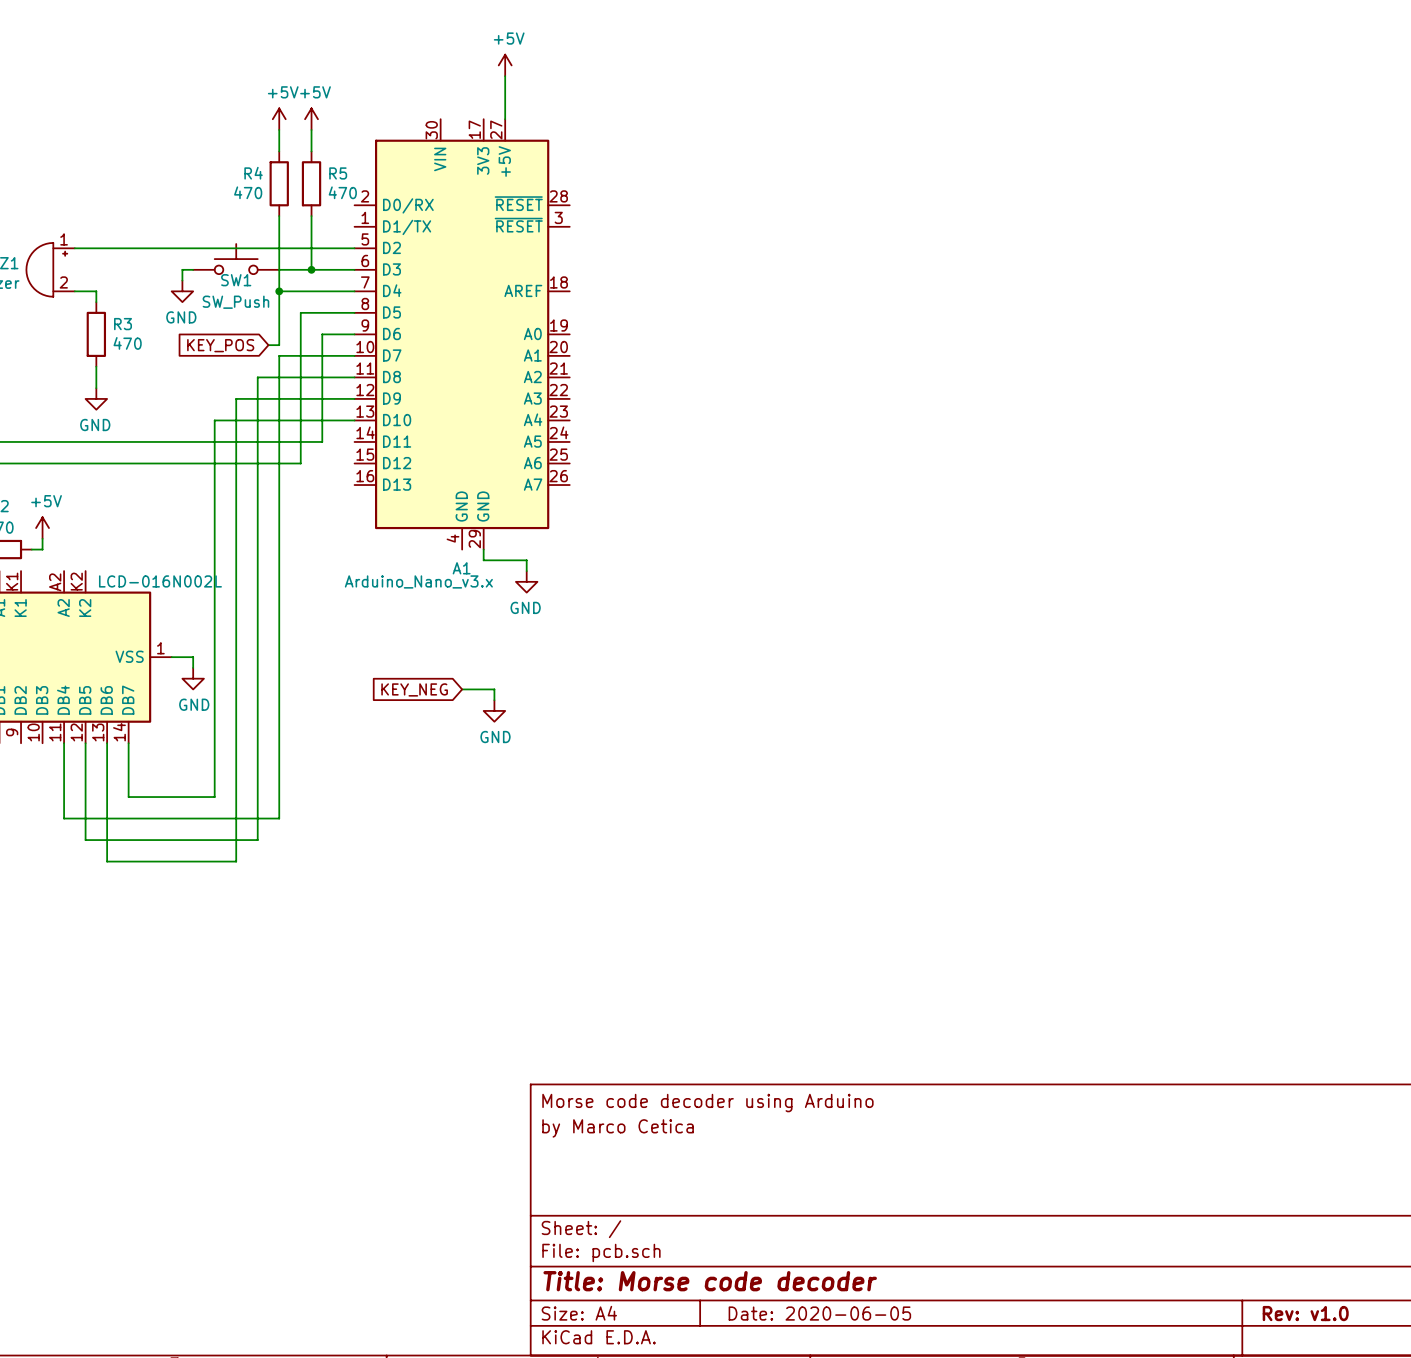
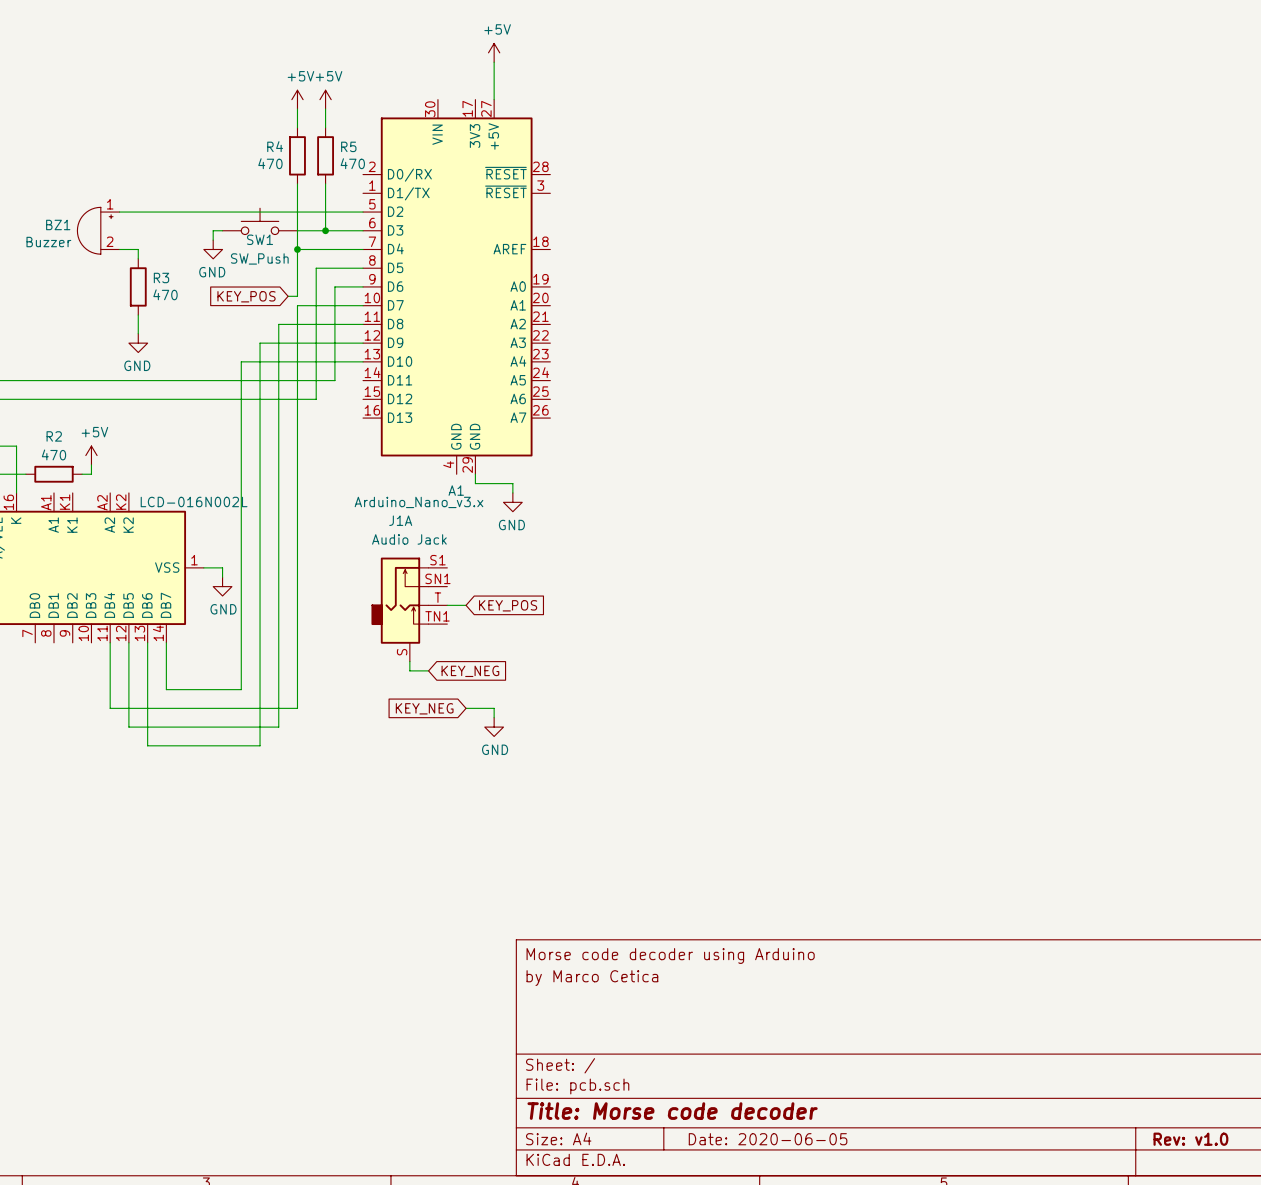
global label: KEY_NEG (414, 689) -> none
wire: (462, 689) (494, 689) (494, 700) -> (466, 708) (494, 708) (494, 717)
wire: none -> (447, 605) (466, 605)
global label: none -> KEY_POS (508, 605)
J1A: none -> Audio Jack (409, 609)
power symbol position: GND (494, 710) -> GND (494, 727)
wire: none -> (409, 661) (409, 670) (428, 670)
global label: none -> KEY_NEG (470, 671)
global label: none -> KEY_NEG (424, 708)

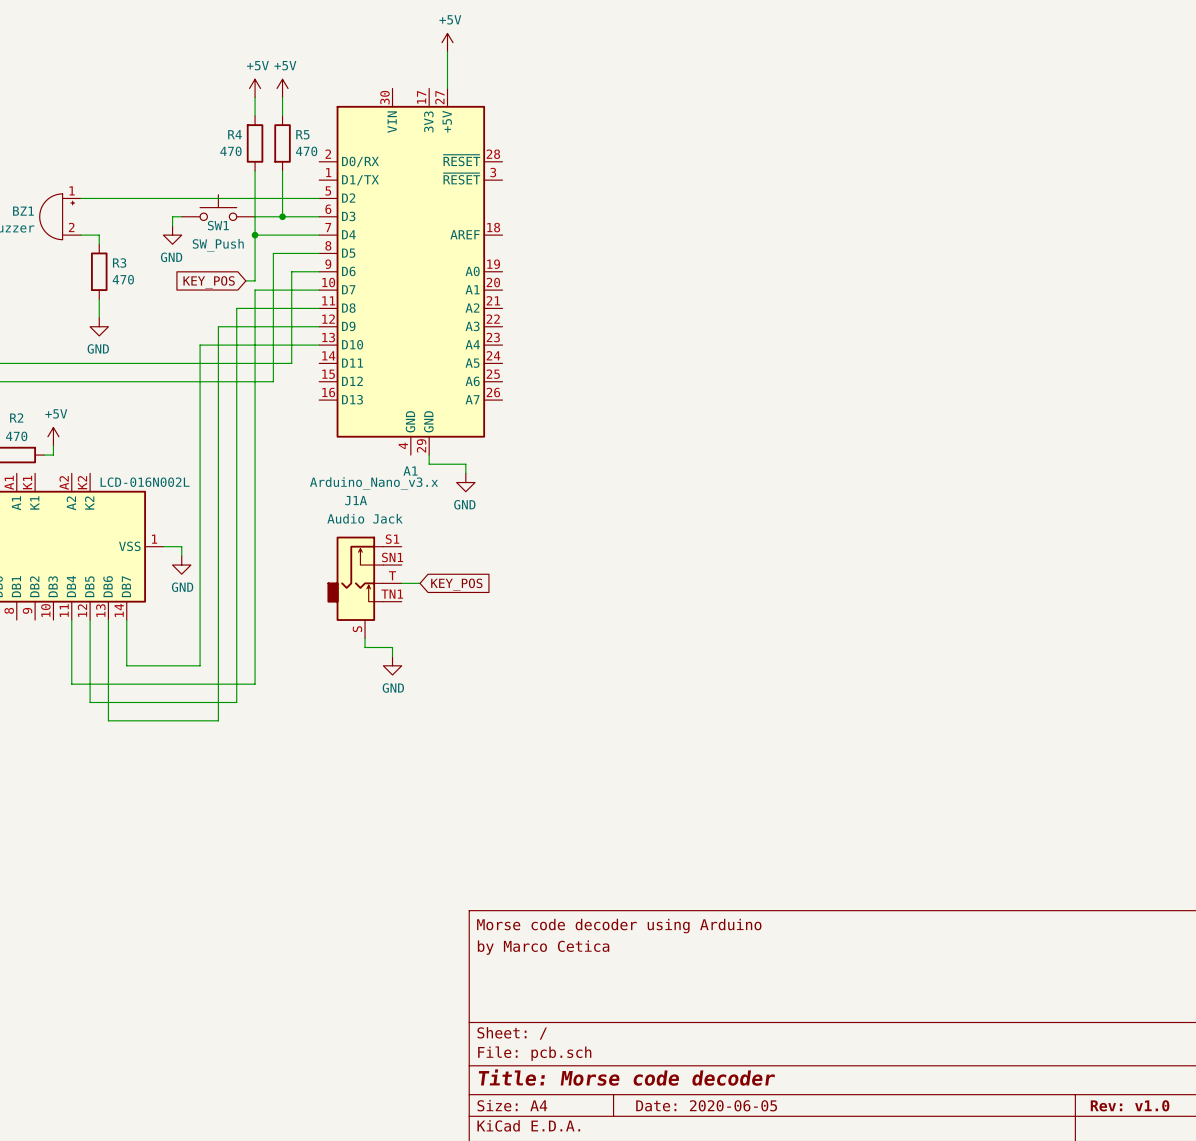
wire: none -> (383, 647) (392, 647) (392, 656)
global label: KEY_NEG (470, 671) -> none
global label: KEY_NEG (424, 708) -> none
wire: (466, 708) (494, 708) (494, 717) -> none
power symbol position: GND (494, 727) -> GND (392, 665)

